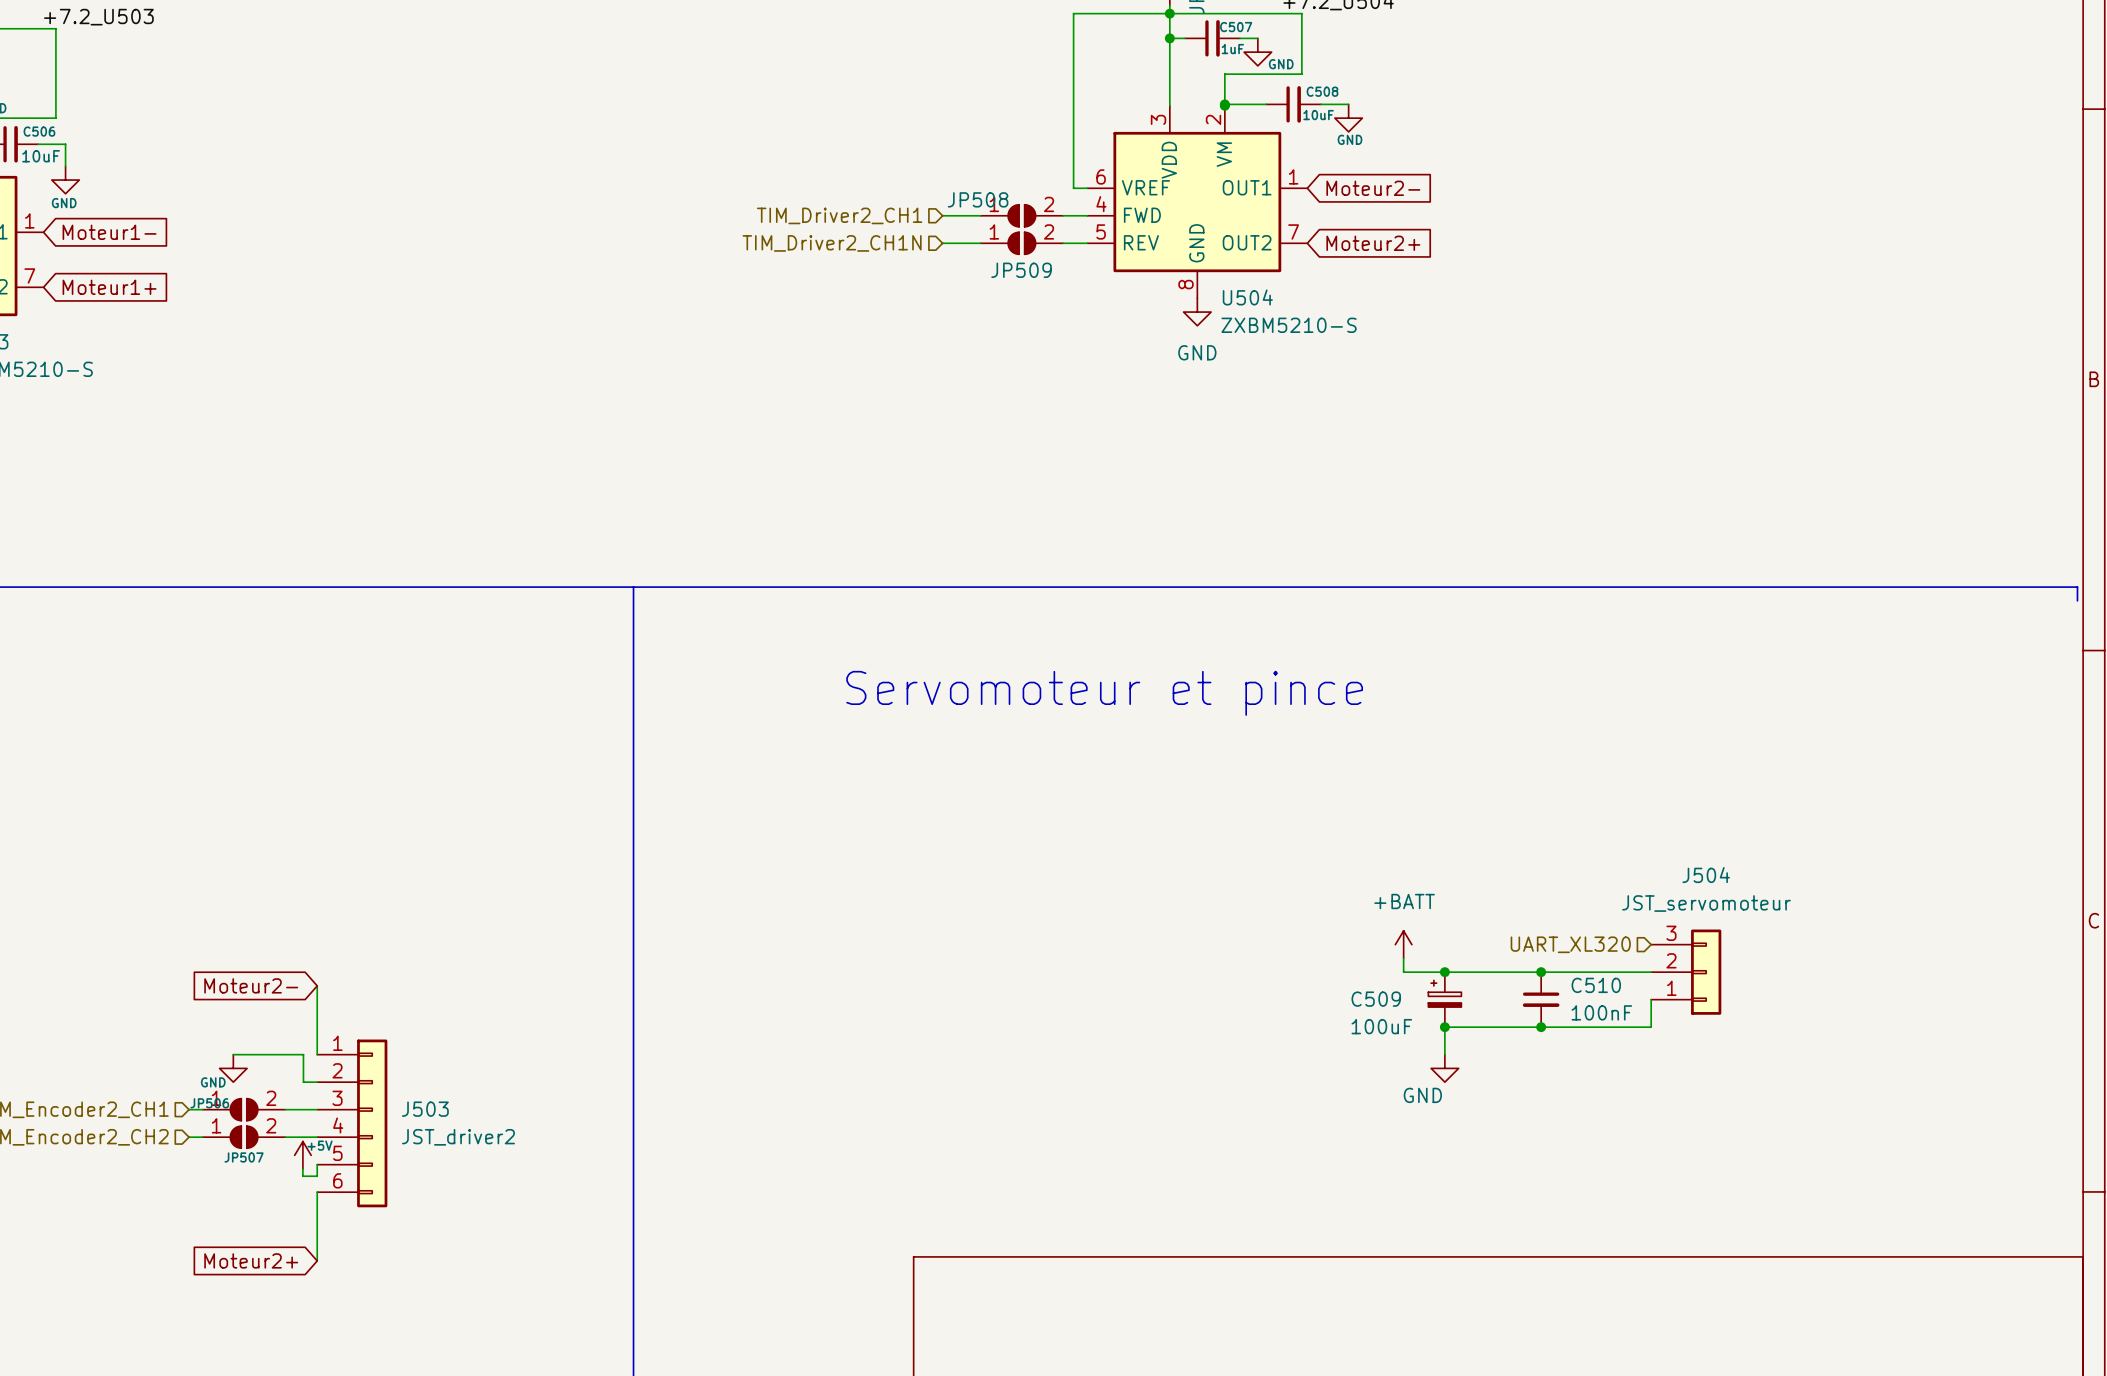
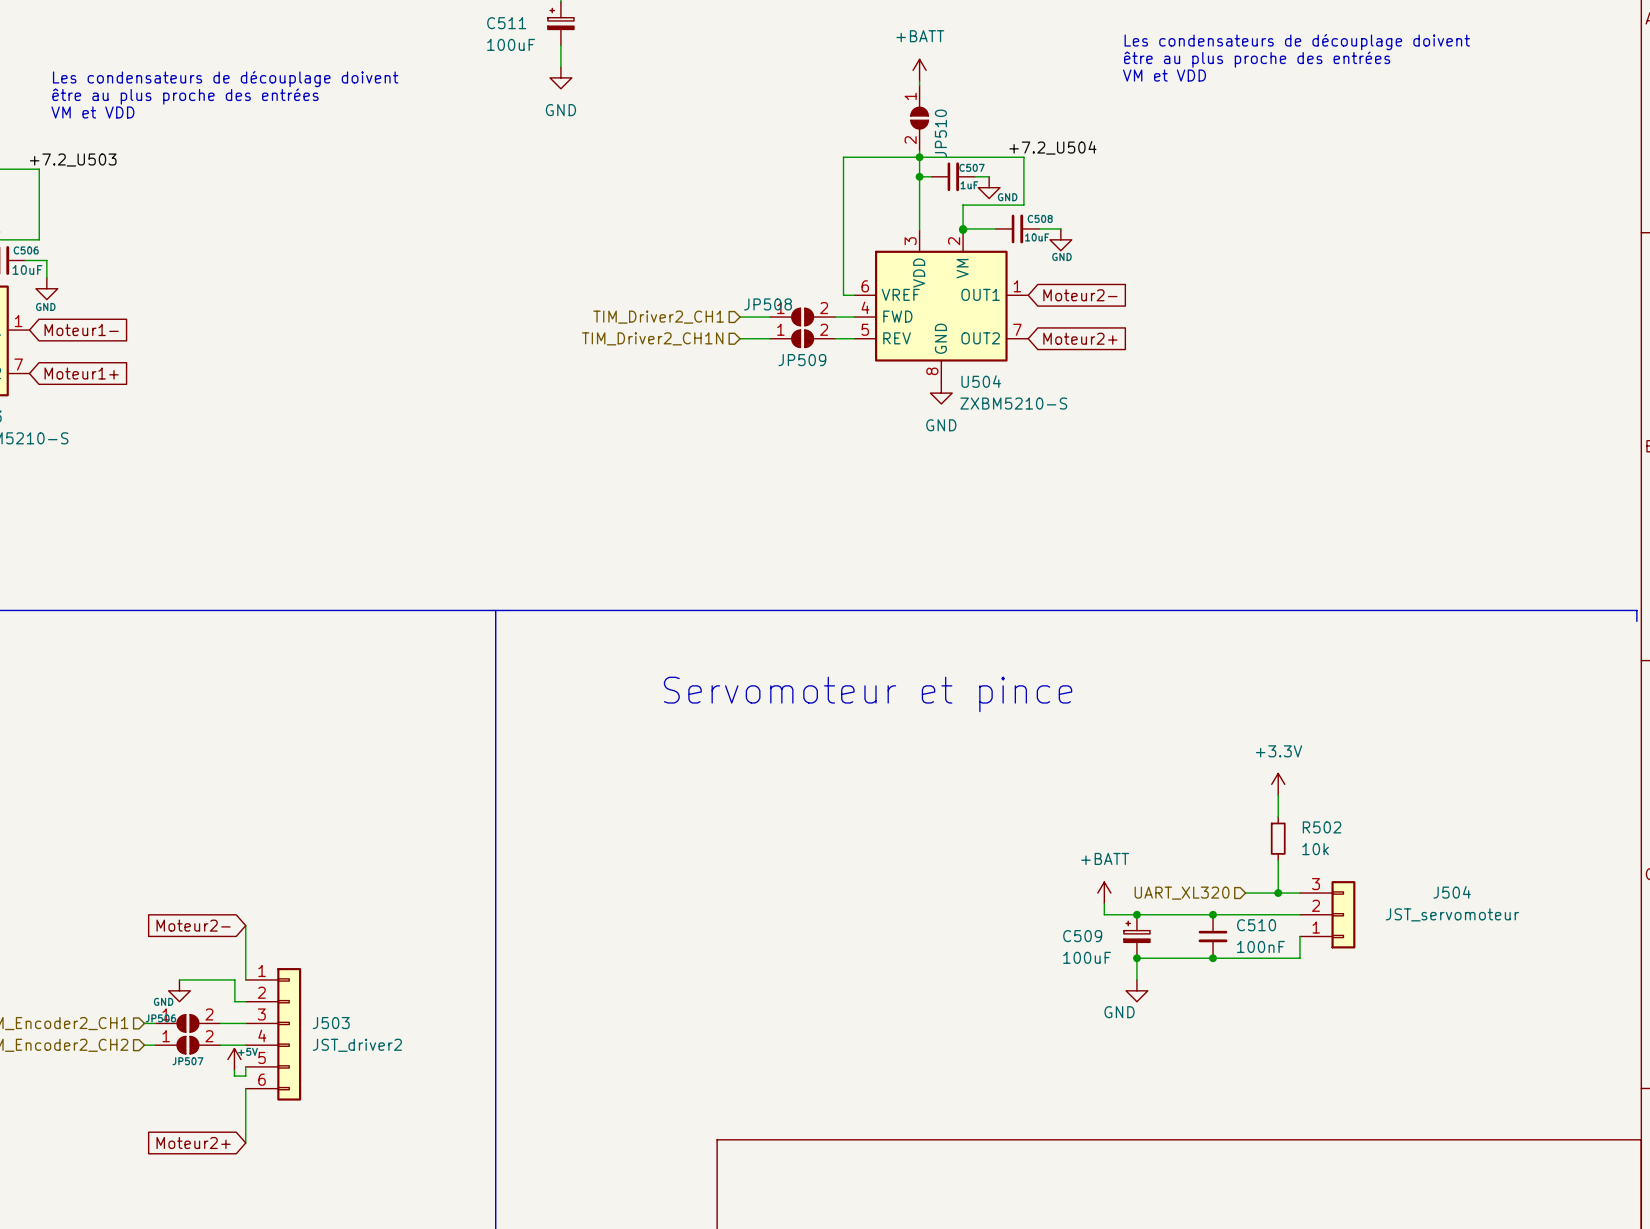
power symbol: none -> +3.3V (1278, 784)
wire: none -> (1278, 795) (1278, 816)
R502: none -> 10k (1278, 838)
J504 name position: J504 (1706, 875) -> J504 (1452, 892)
wire: none -> (1278, 860) (1278, 893)
J504 value position: JST_servomoteur (1706, 903) -> JST_servomoteur (1452, 914)
hierarchical label position: UART_XL320 (1570, 944) -> UART_XL320 (1182, 893)
wire: none -> (1245, 893) (1299, 893)
junction: none -> (1278, 893)

